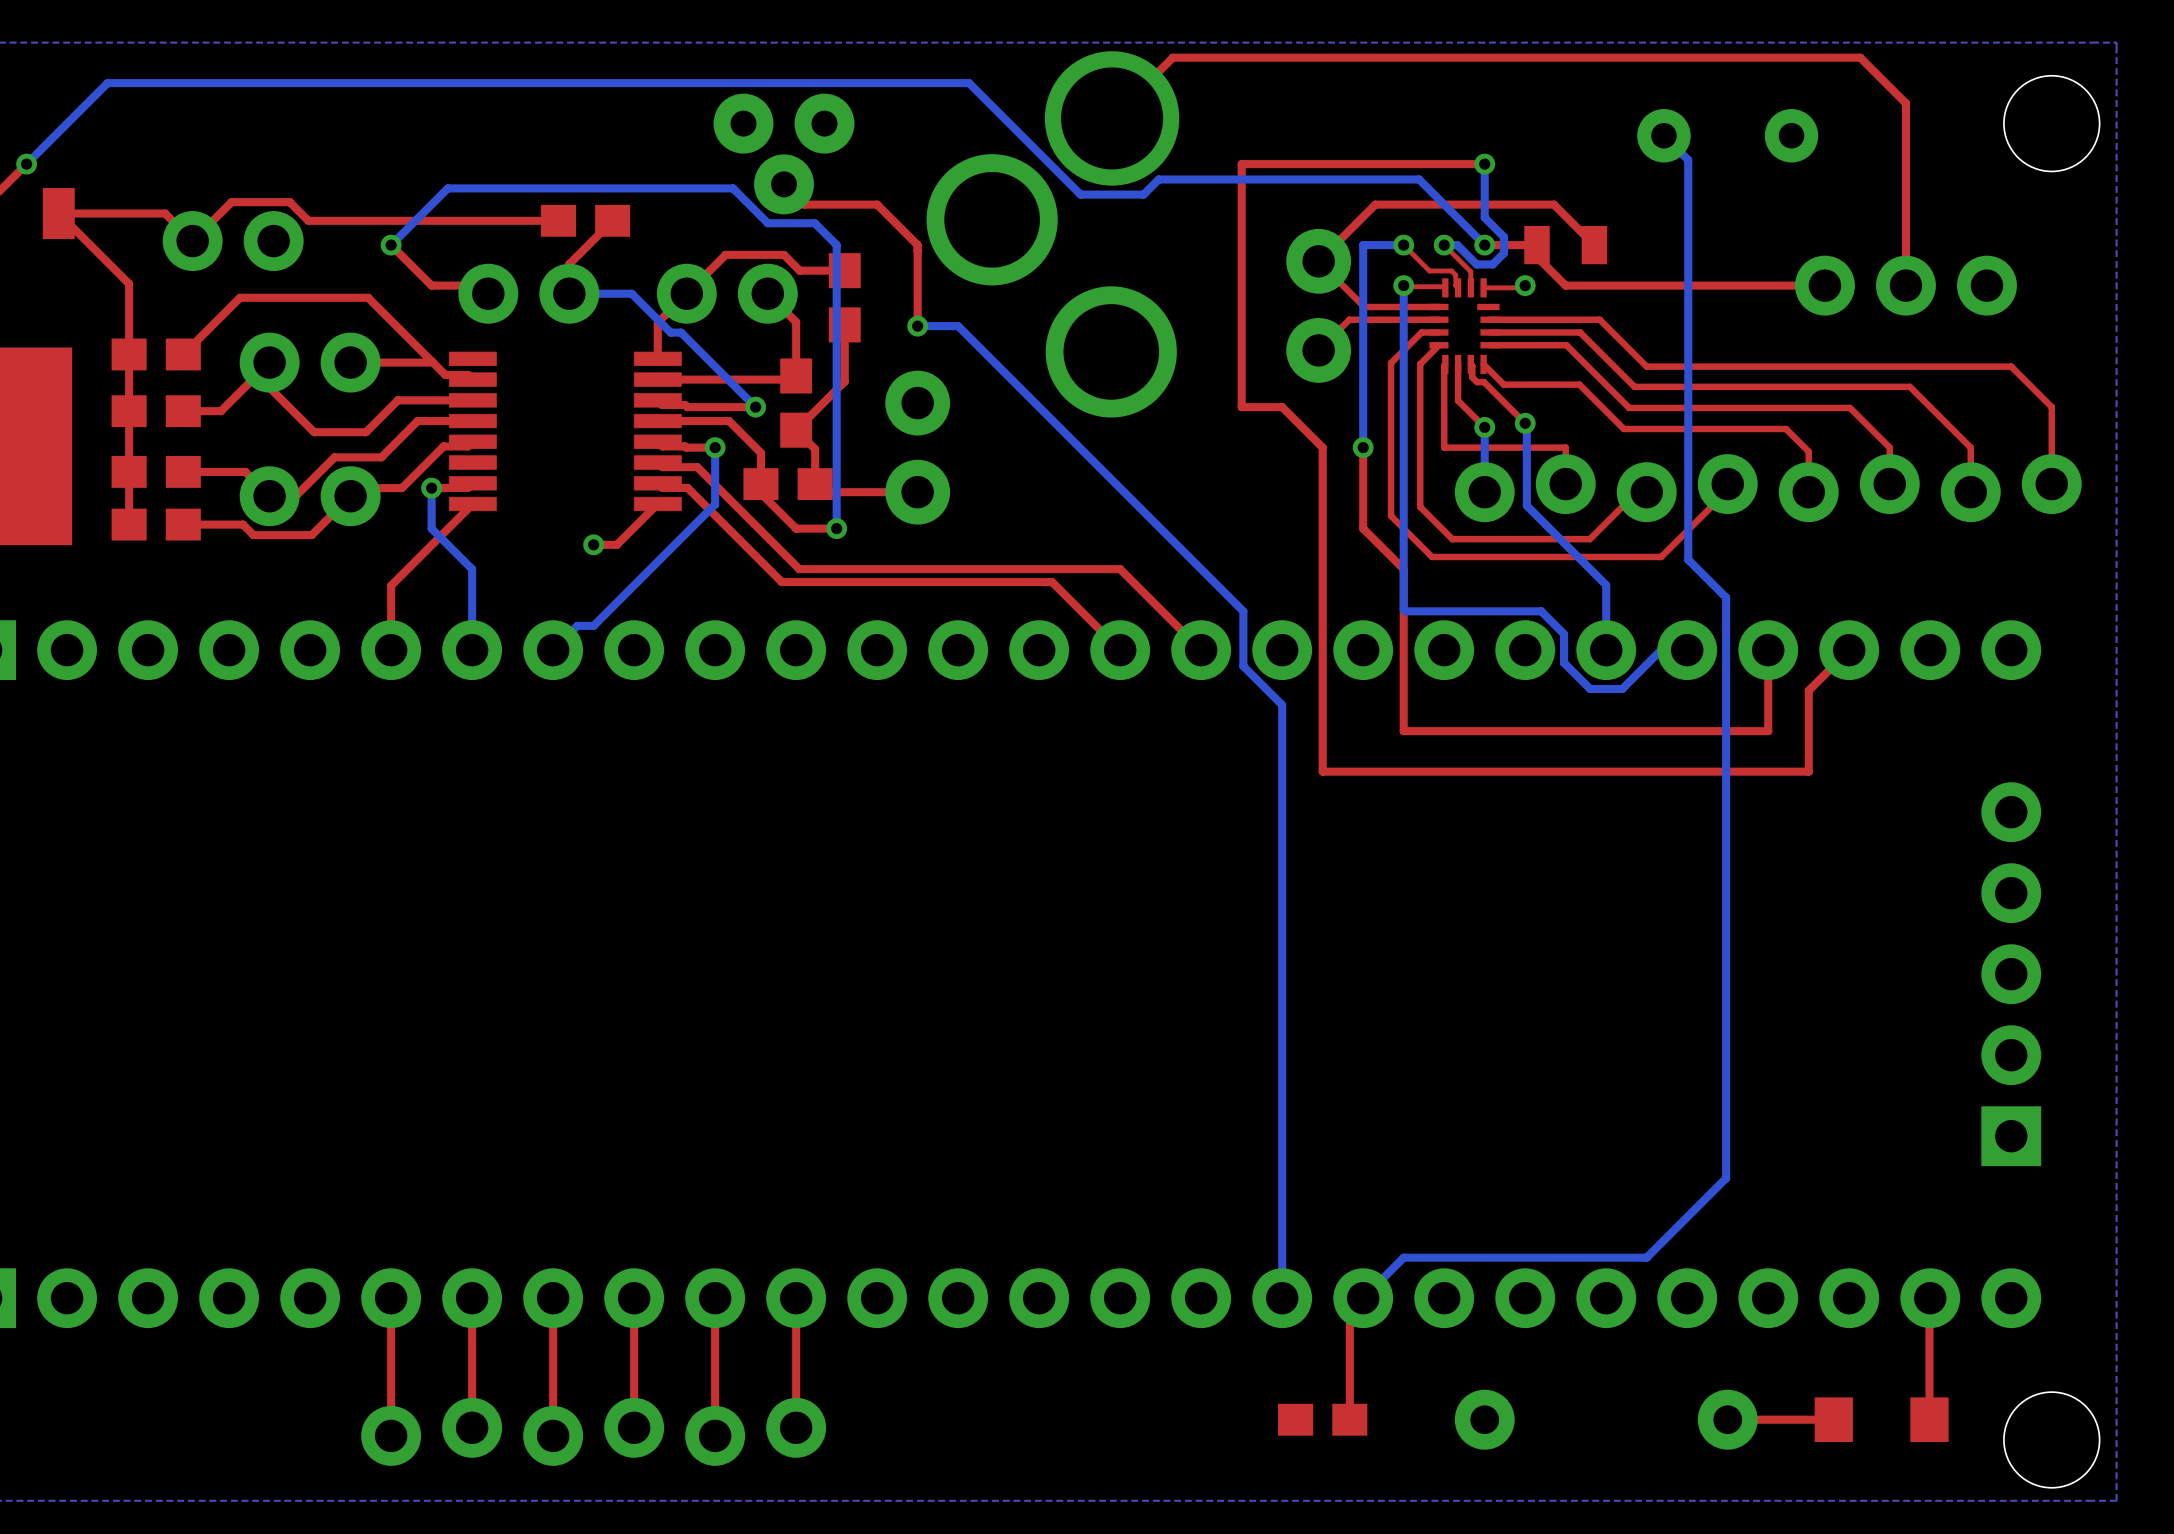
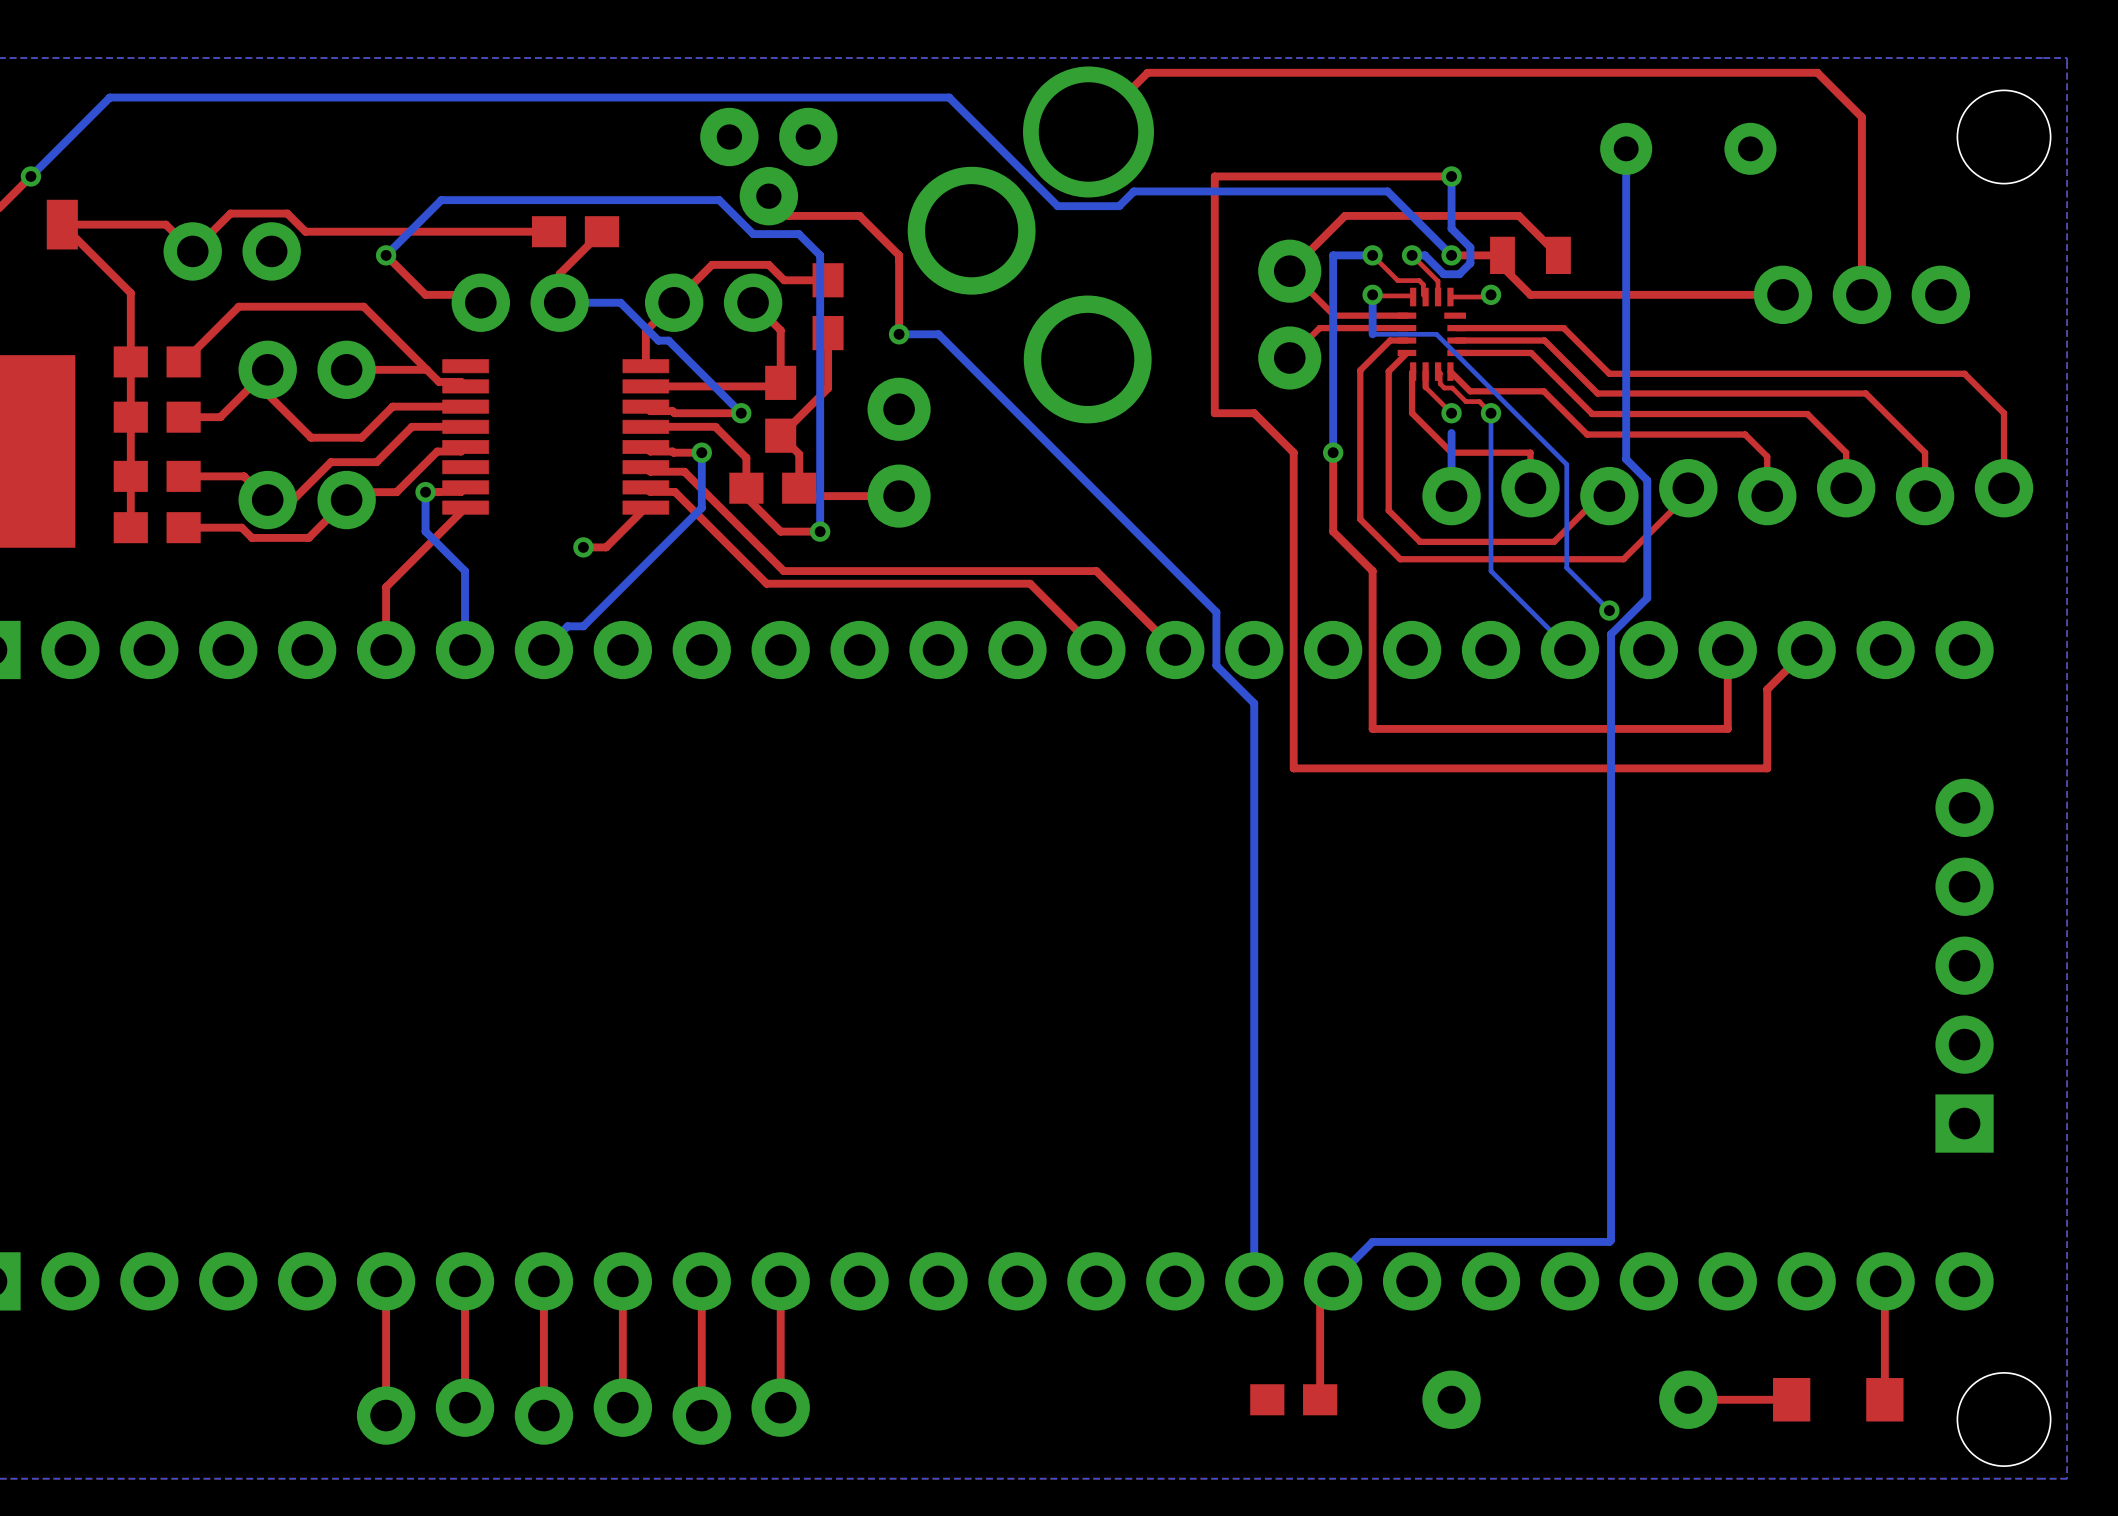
bottom track: (1663, 135) (1688, 160) (1688, 559) (1726, 597) (1726, 1178) (1648, 1256) -> (1626, 148) (1626, 459) (1647, 480) (1647, 598) (1611, 634) (1611, 1240)
bottom track: (1403, 326) (1403, 609) (1405, 611) (1541, 611) (1564, 634) (1564, 662) (1590, 688) (1622, 688) (1661, 650) (1687, 650) -> (1372, 334) (1436, 334) (1566, 464) (1566, 567) (1609, 610)
top track: (1472, 365) (1472, 377) (1477, 382) (1483, 382) (1525, 423) -> (1439, 372) (1440, 383) (1444, 388) (1452, 388) (1465, 401) (1479, 401) (1491, 413)
top track: (1458, 380) (1458, 400) (1484, 427) -> (1425, 387) (1451, 413)
top track: (1444, 407) (1444, 447) (1484, 447) -> (1412, 413) (1451, 452)
bottom track: (1525, 423) (1526, 424) (1526, 505) (1606, 585) (1606, 650) -> (1491, 413) (1491, 571) (1569, 650)
via position: (1525, 423) -> (1491, 413)
via position: (1484, 427) -> (1451, 413)
via: none -> (1609, 610)

